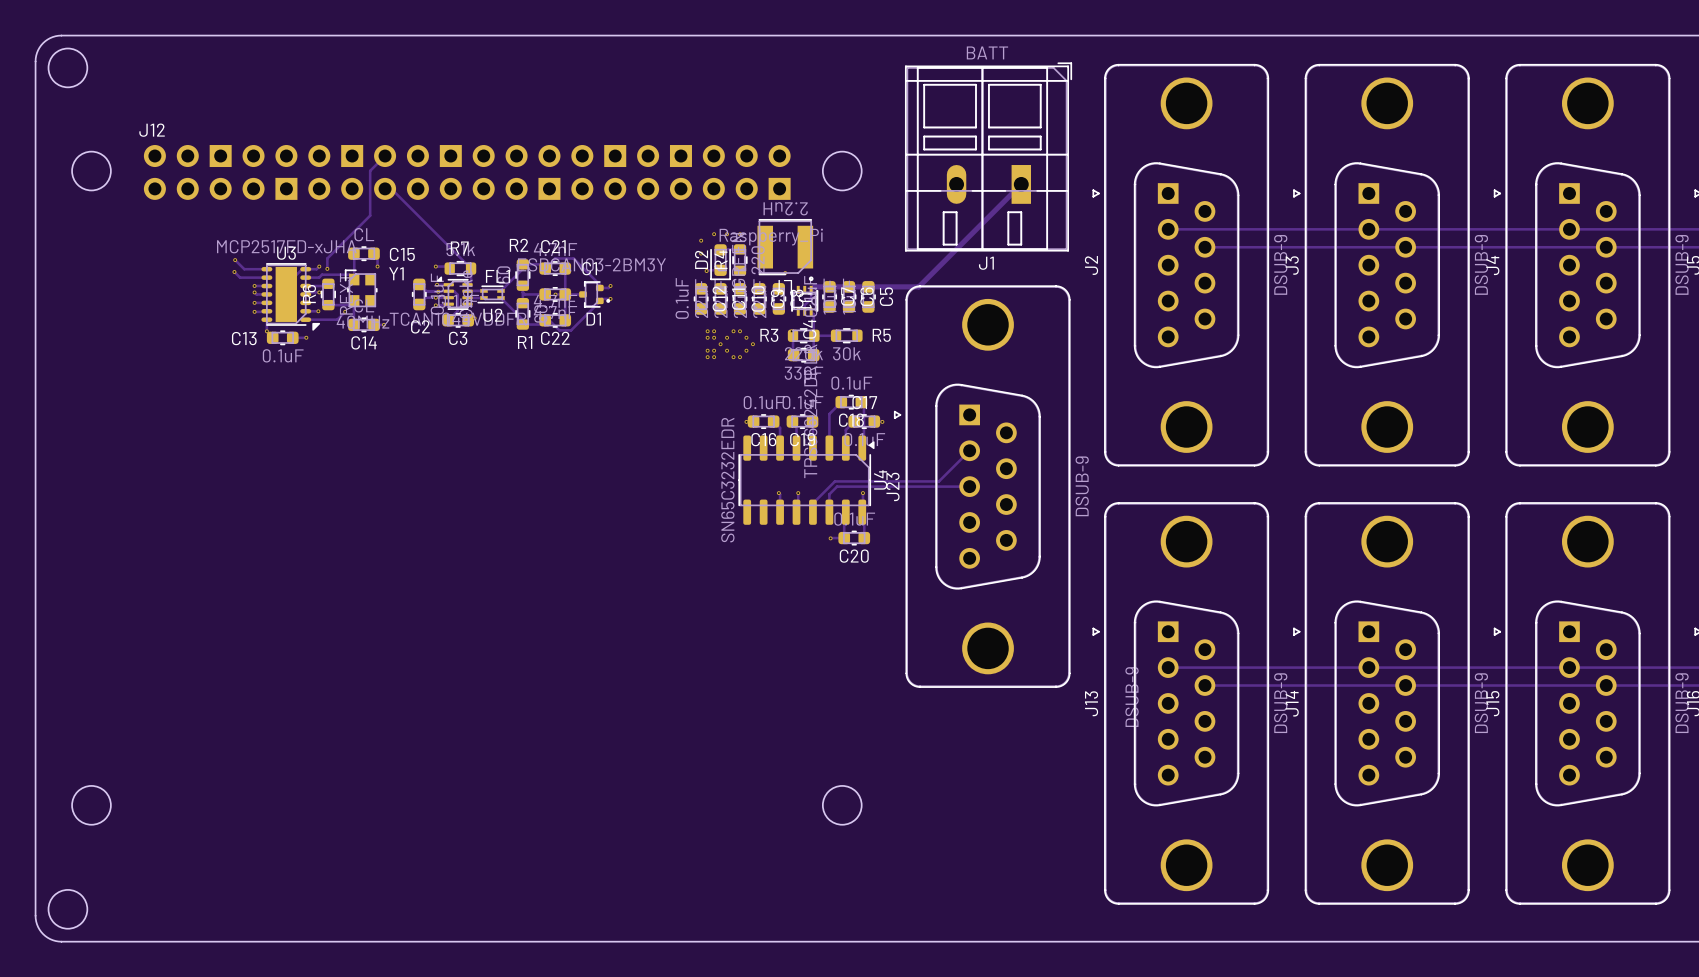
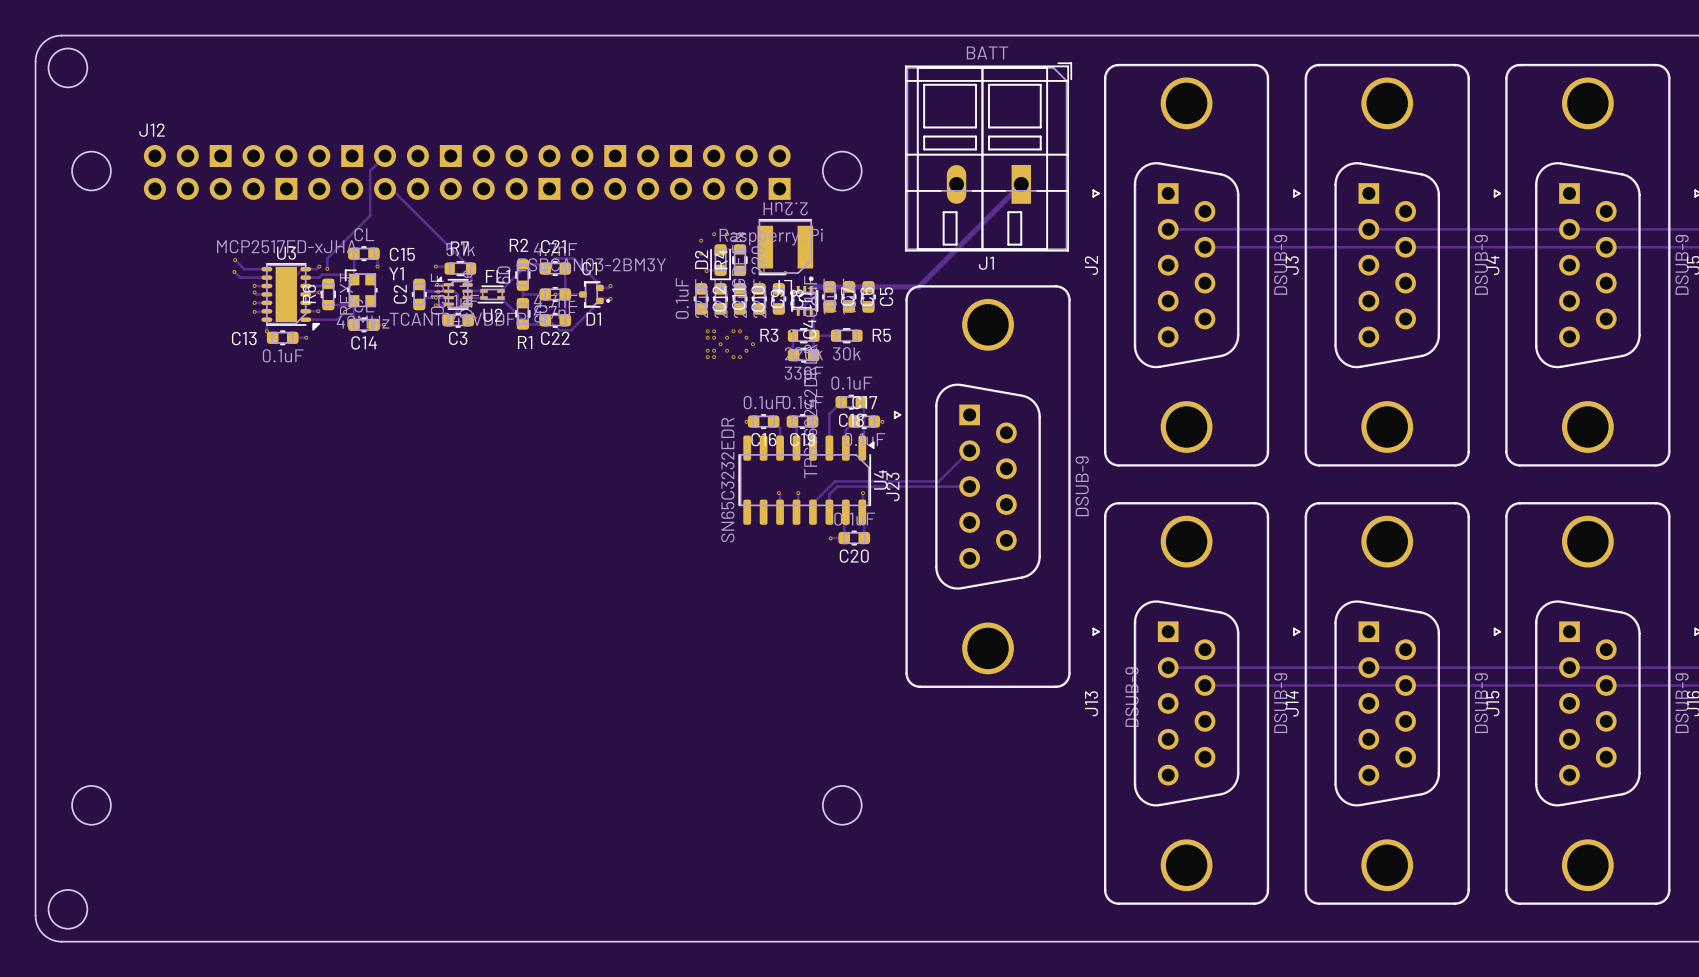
C2 name rotation: 0° (420, 326) -> 90° counterclockwise (400, 294)
C2 name position: C2 (420, 326) -> C2 (400, 294)

